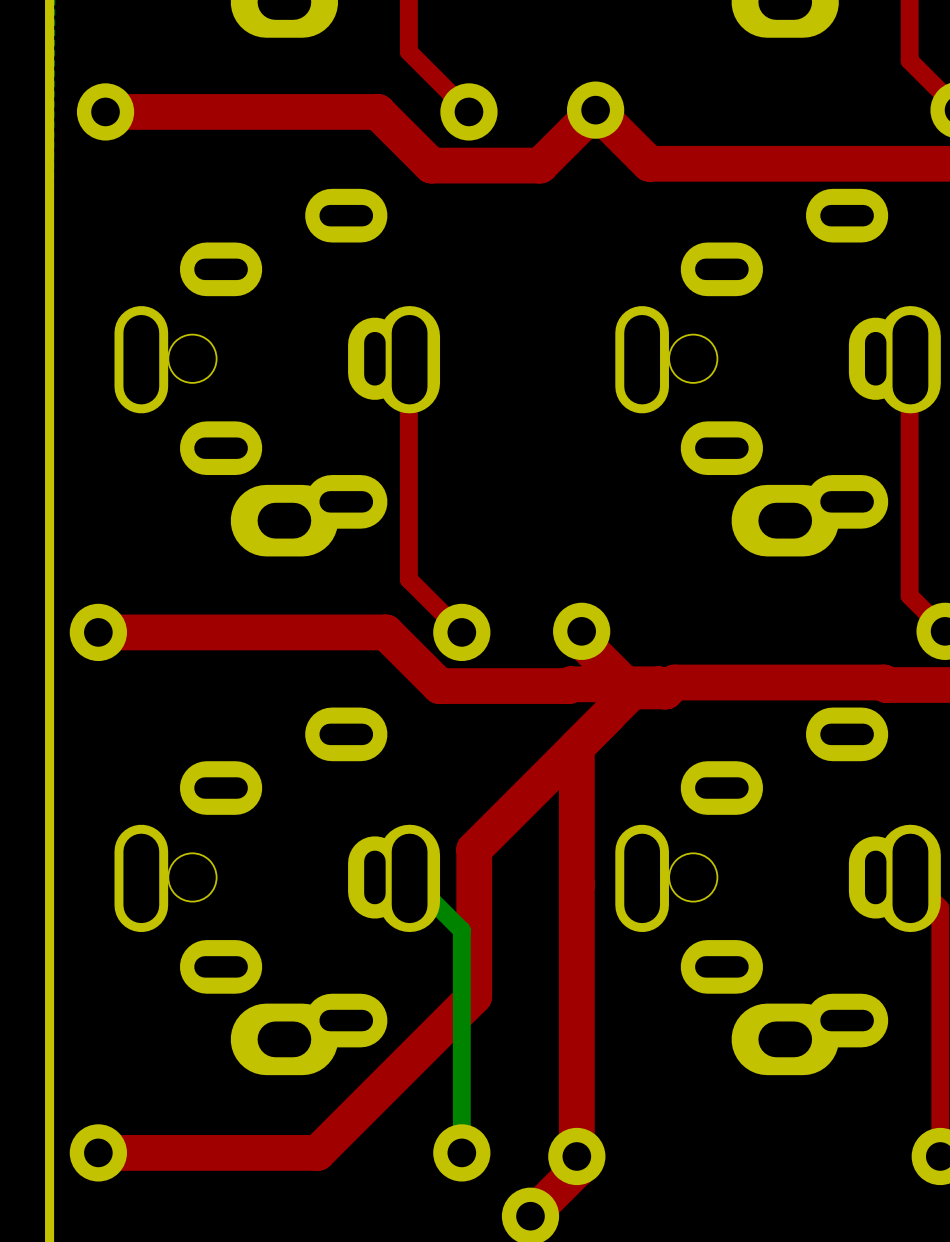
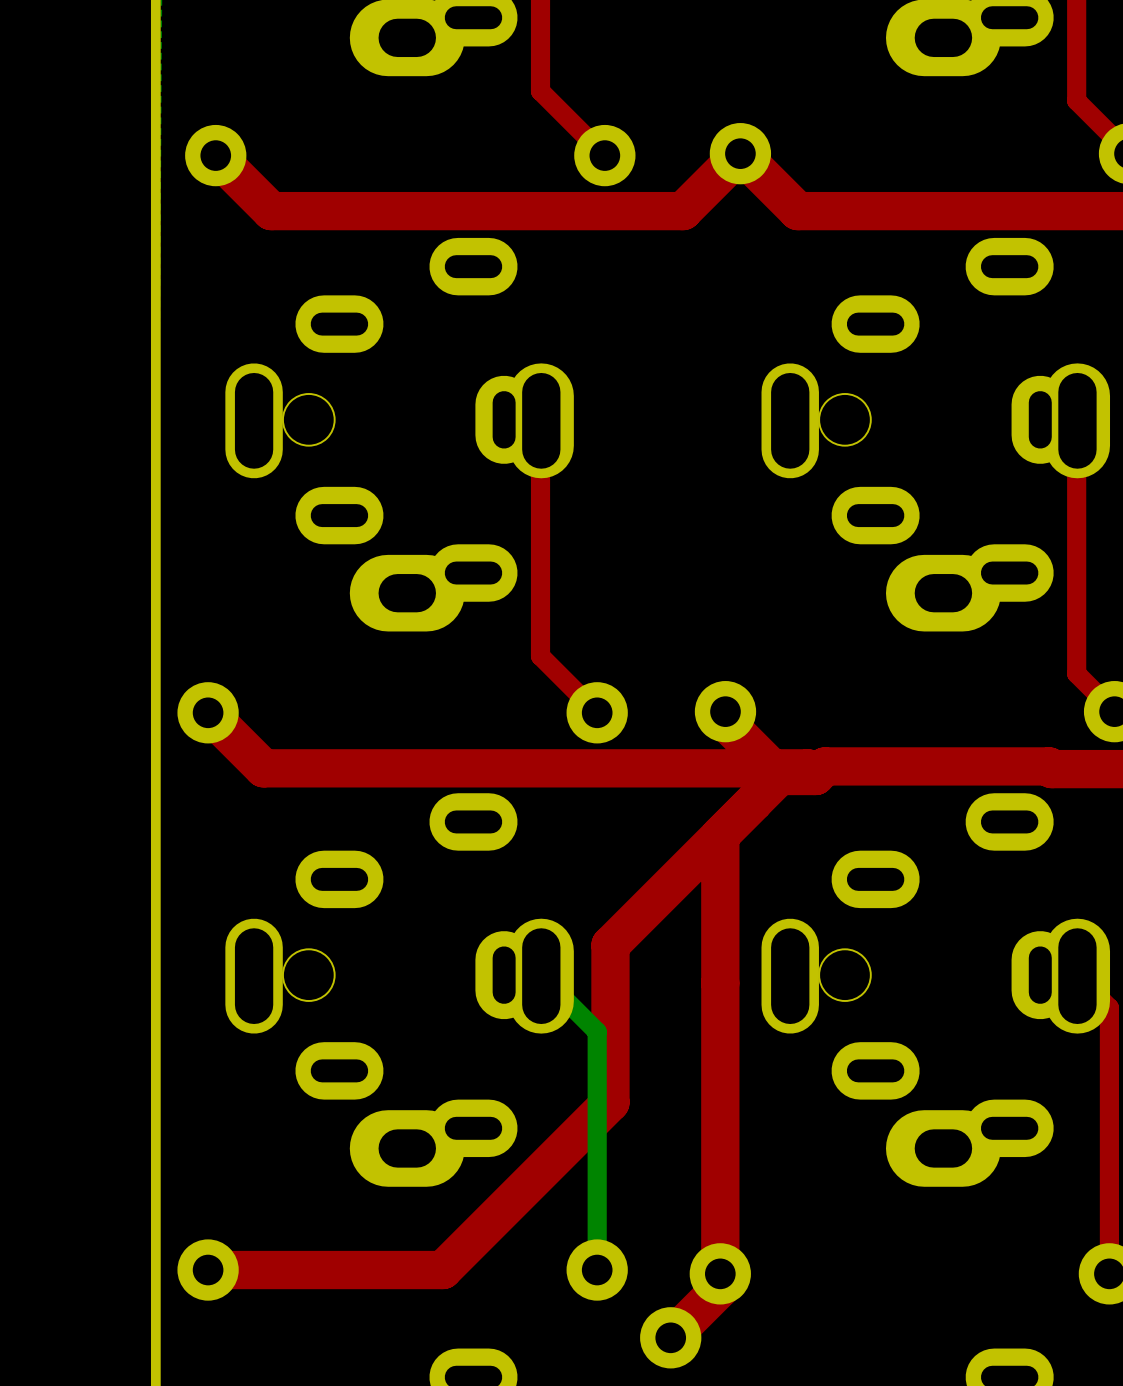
top track: (105, 111) (377, 111) (431, 165) (540, 165) (541, 163) -> (215, 155) (271, 211) (682, 211)
top track: (98, 632) (385, 632) (439, 686) (568, 686) (570, 684) -> (208, 712) (263, 768) (713, 768)

